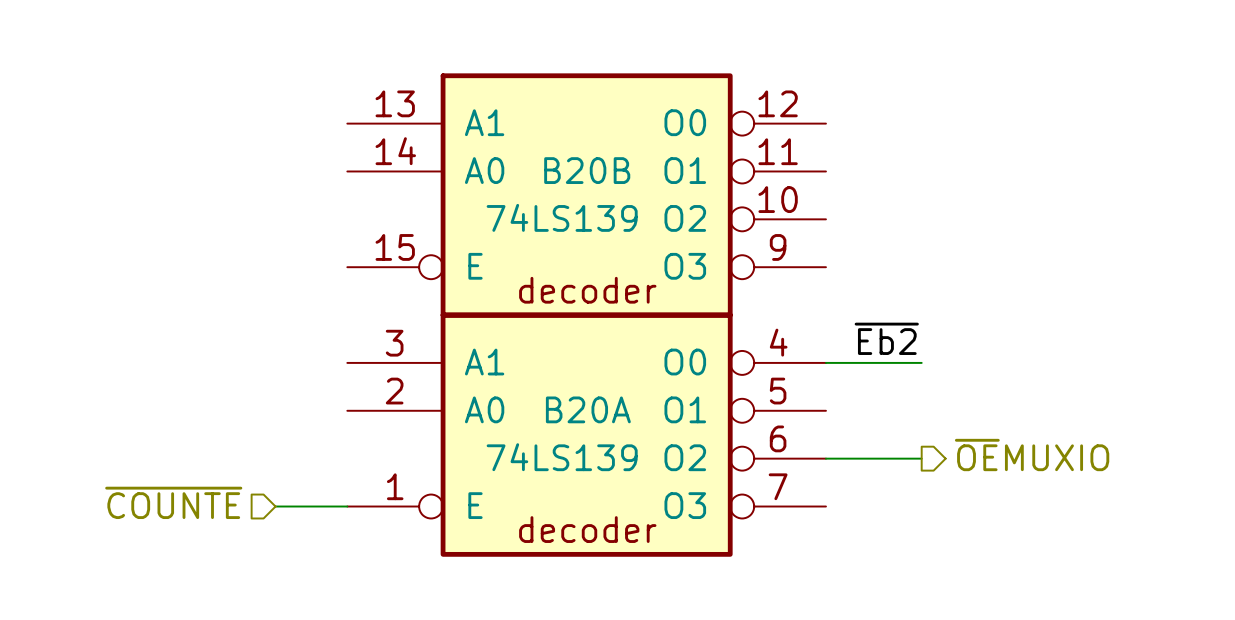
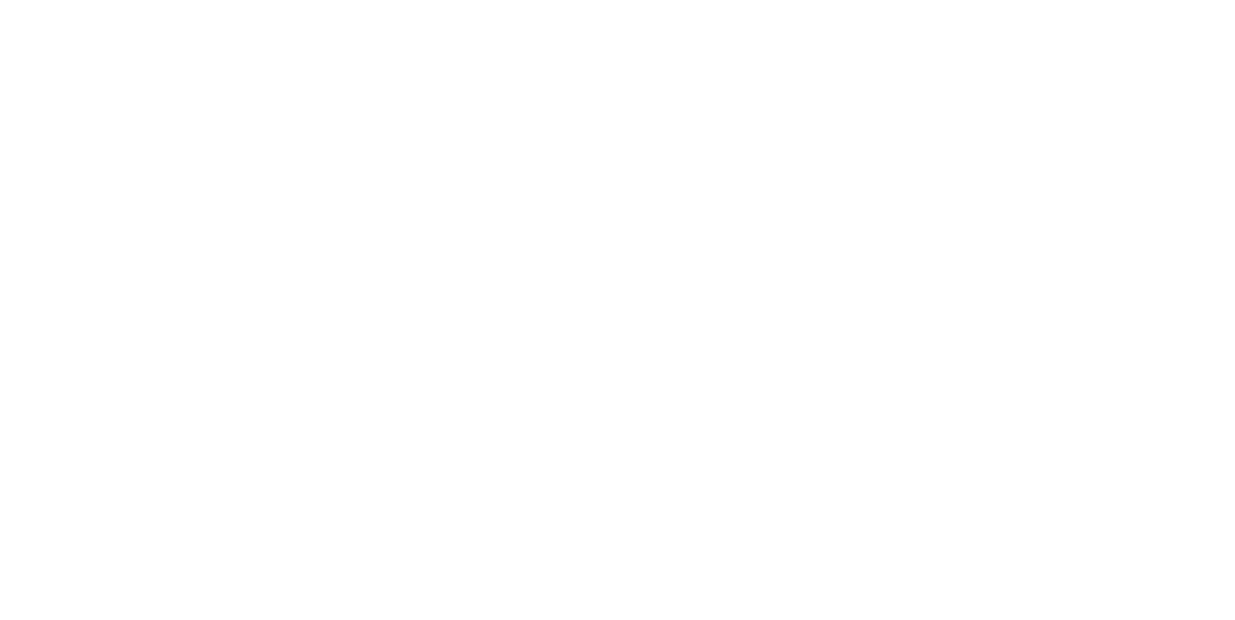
B20B: 74LS139 (586, 195) -> none
label: ~{Eb2} (886, 338) -> none
wire: (825, 362) (921, 362) -> none
B20A: 74LS139 (586, 434) -> none
hierarchical label: ~{OE}MUXIO (1032, 455) -> none
wire: (825, 458) (921, 458) -> none
hierarchical label: ~{COUNTE} (173, 502) -> none
wire: (275, 506) (347, 506) -> none

